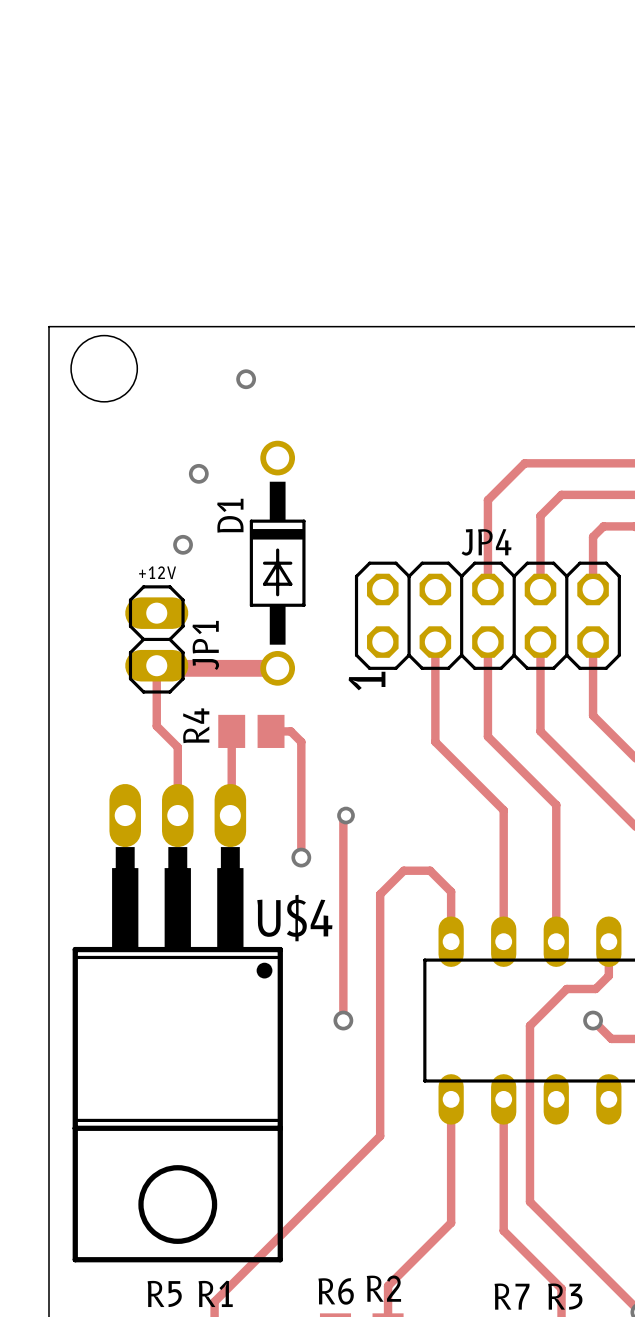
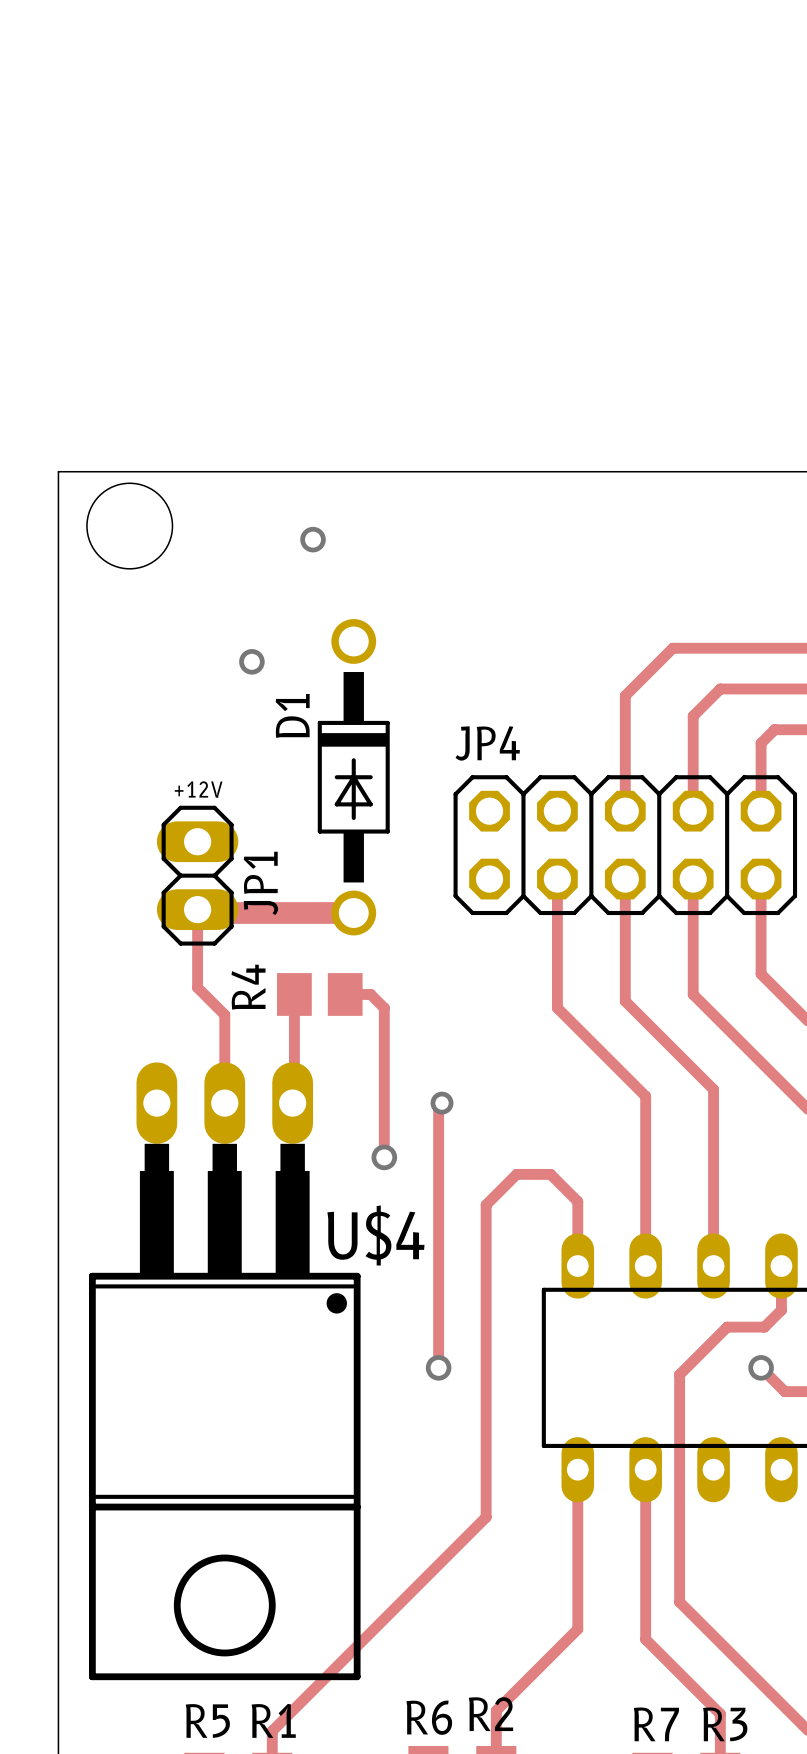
JP4 name position: JP4 (486, 542) -> JP4 (487, 743)
via: (183, 544) -> none
text: 1 (367, 681) -> none

